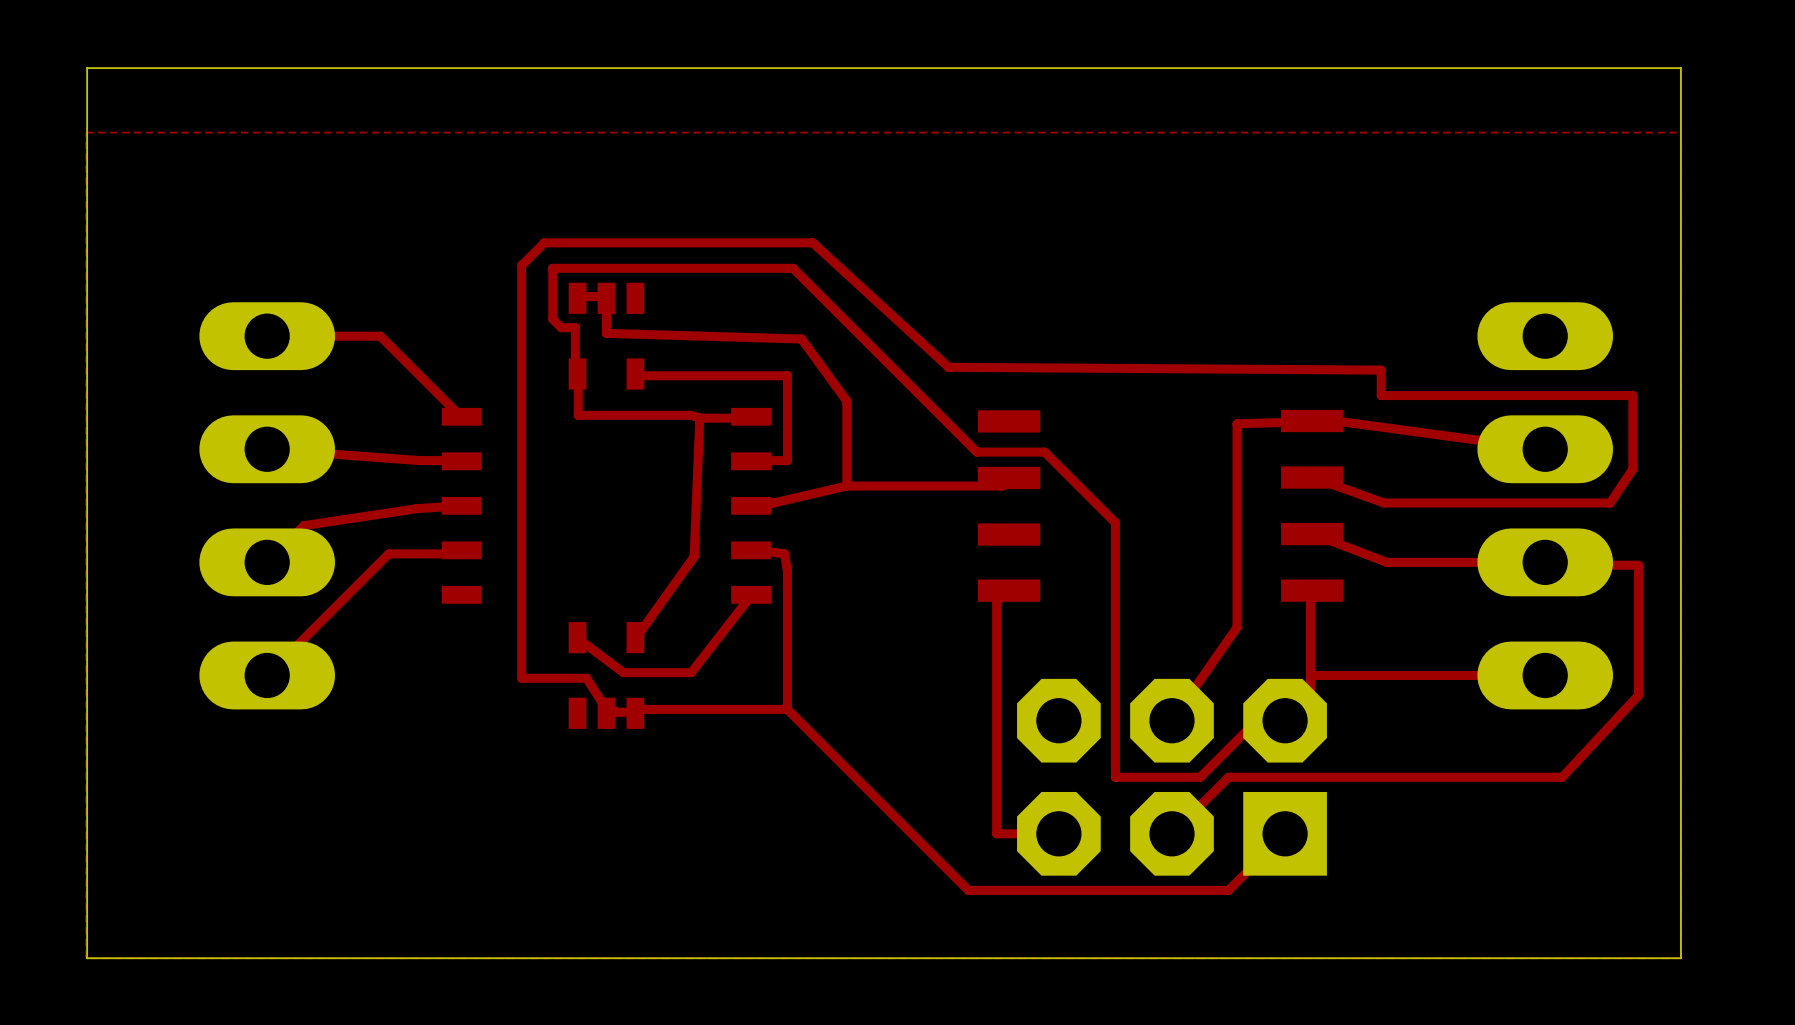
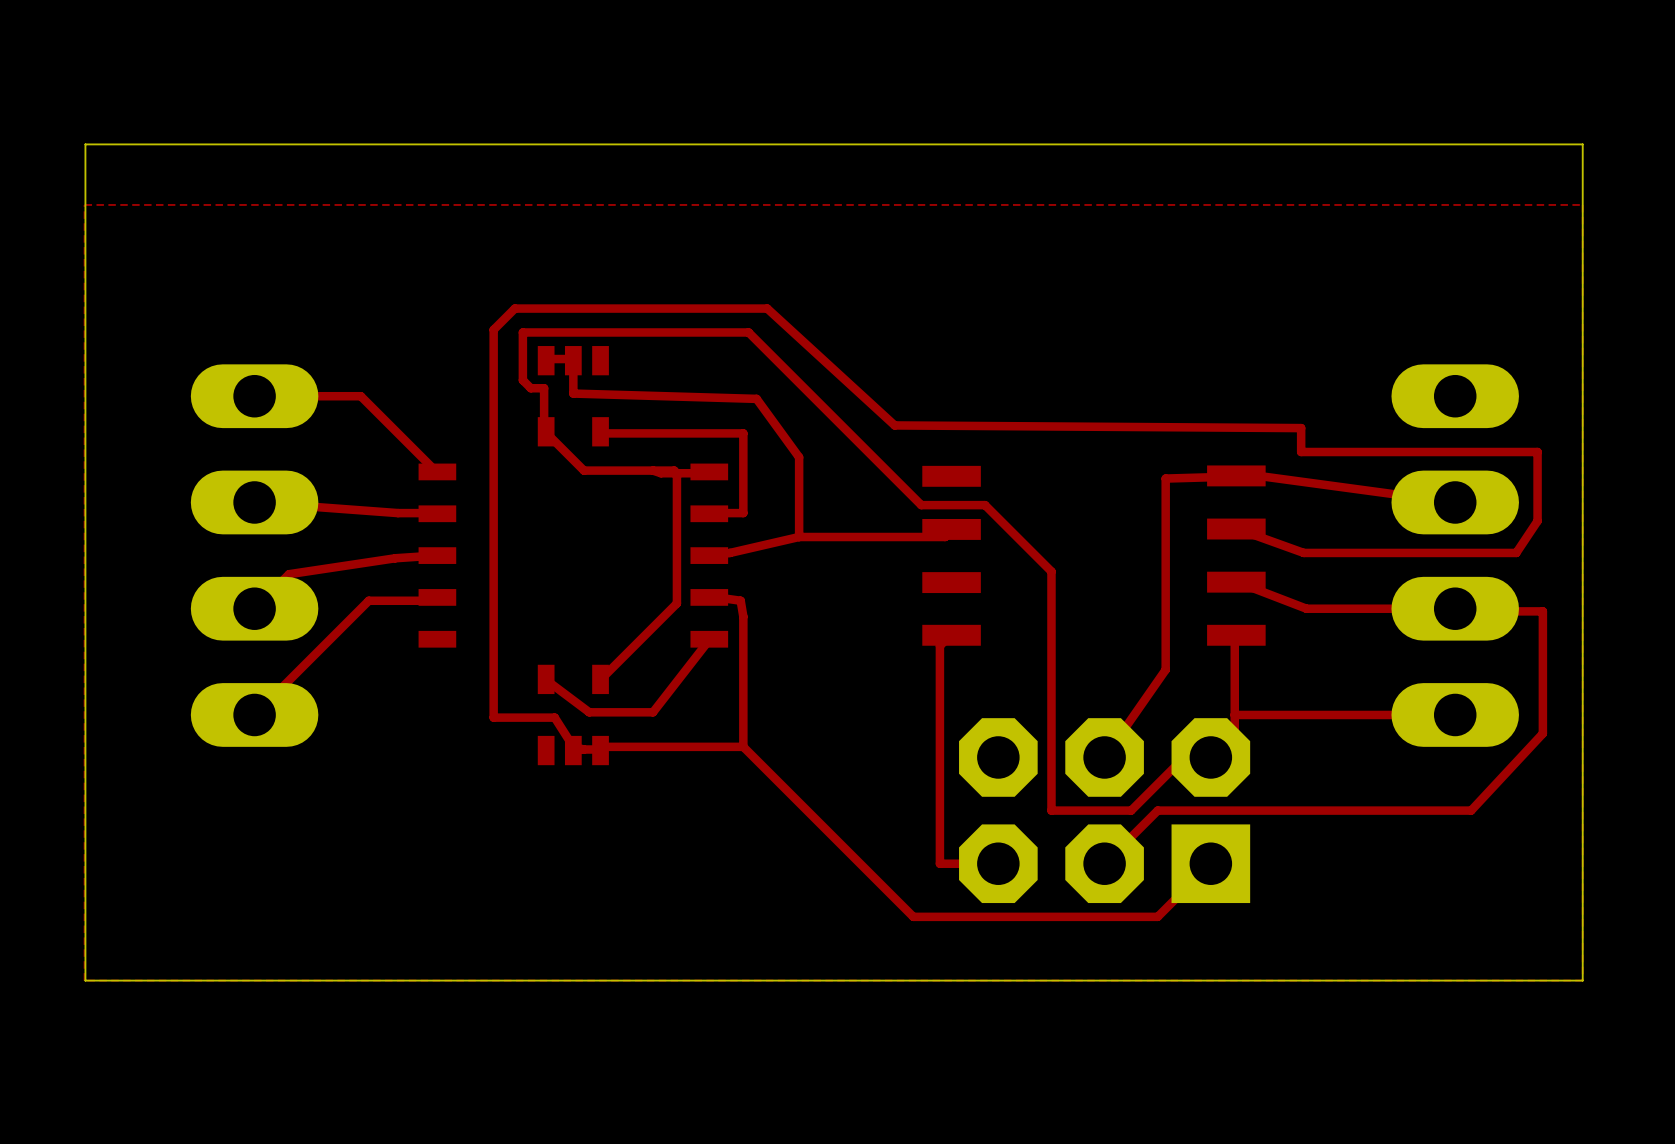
top track: (578, 375) (578, 415) (617, 415) -> (546, 433) (583, 470)
top track: (699, 418) (694, 556) (637, 635) -> (653, 470) (674, 470) (676, 473) (676, 603) (602, 677)

